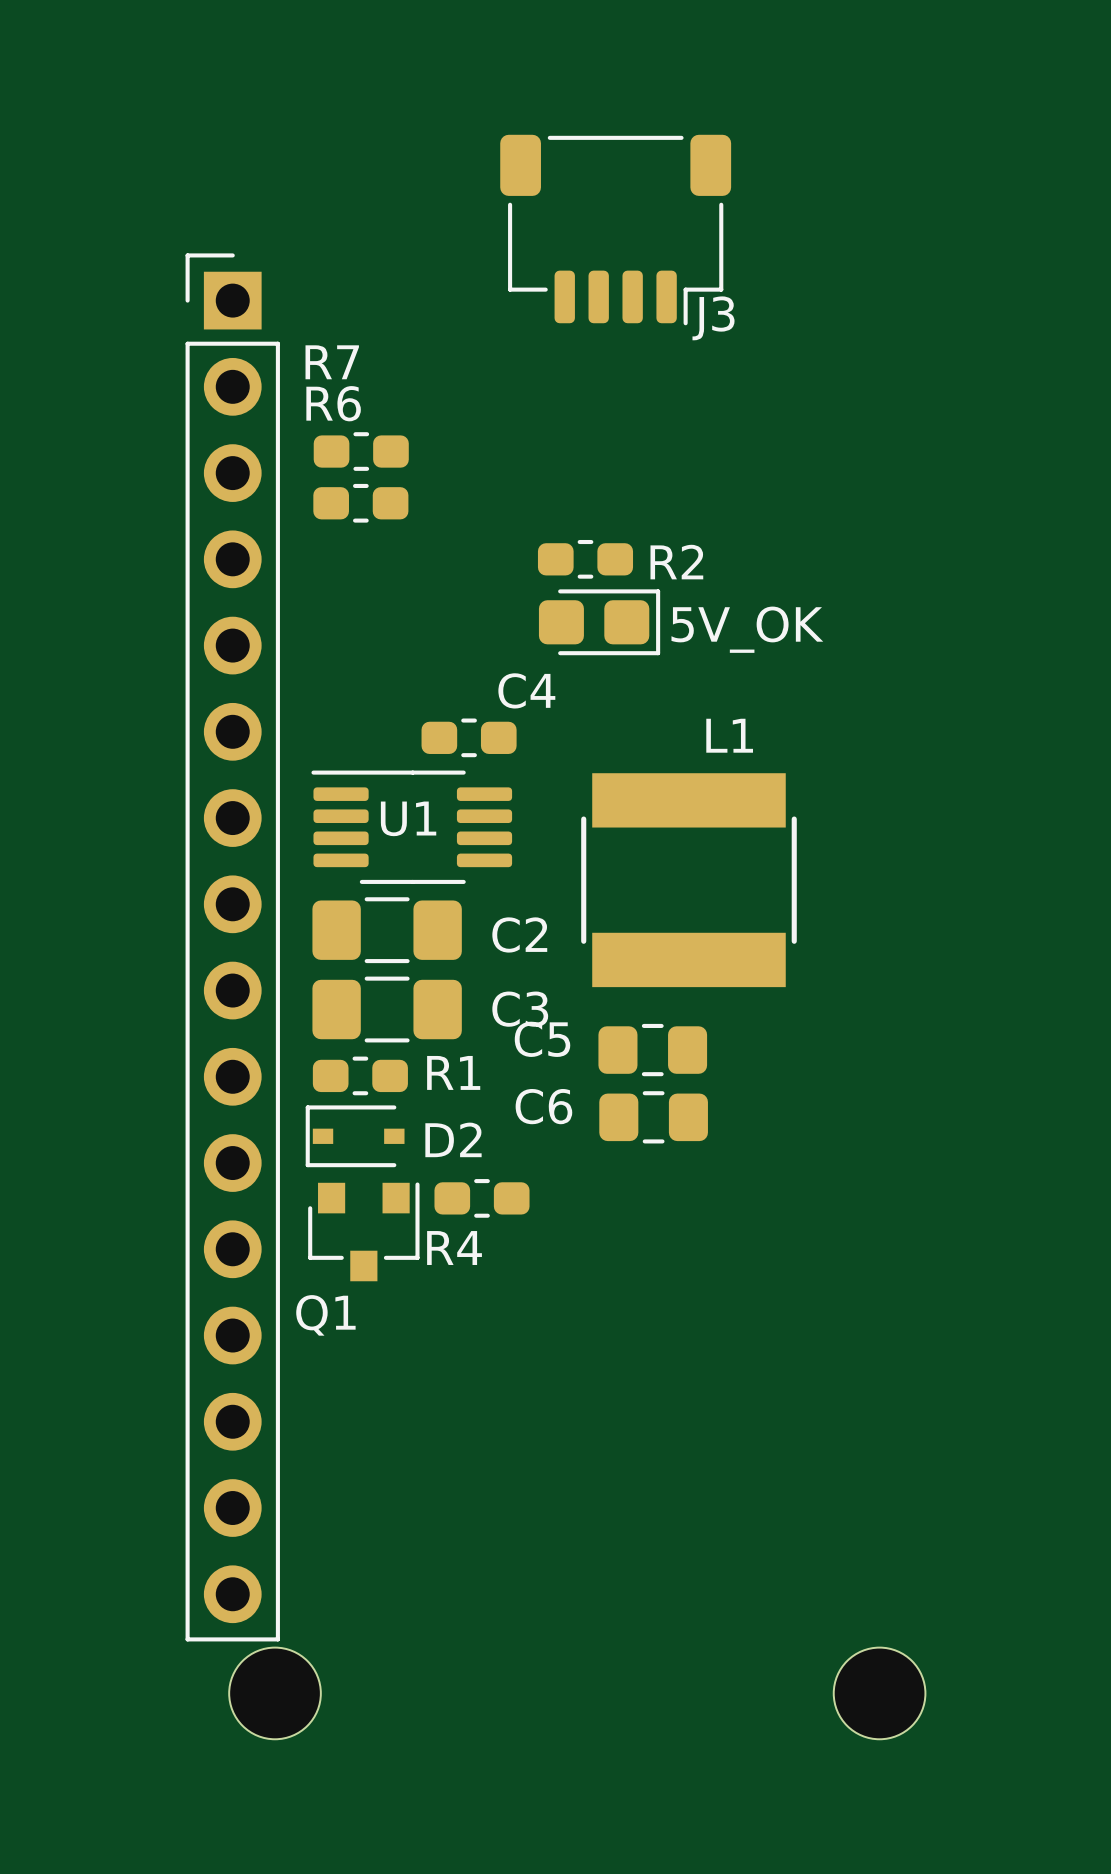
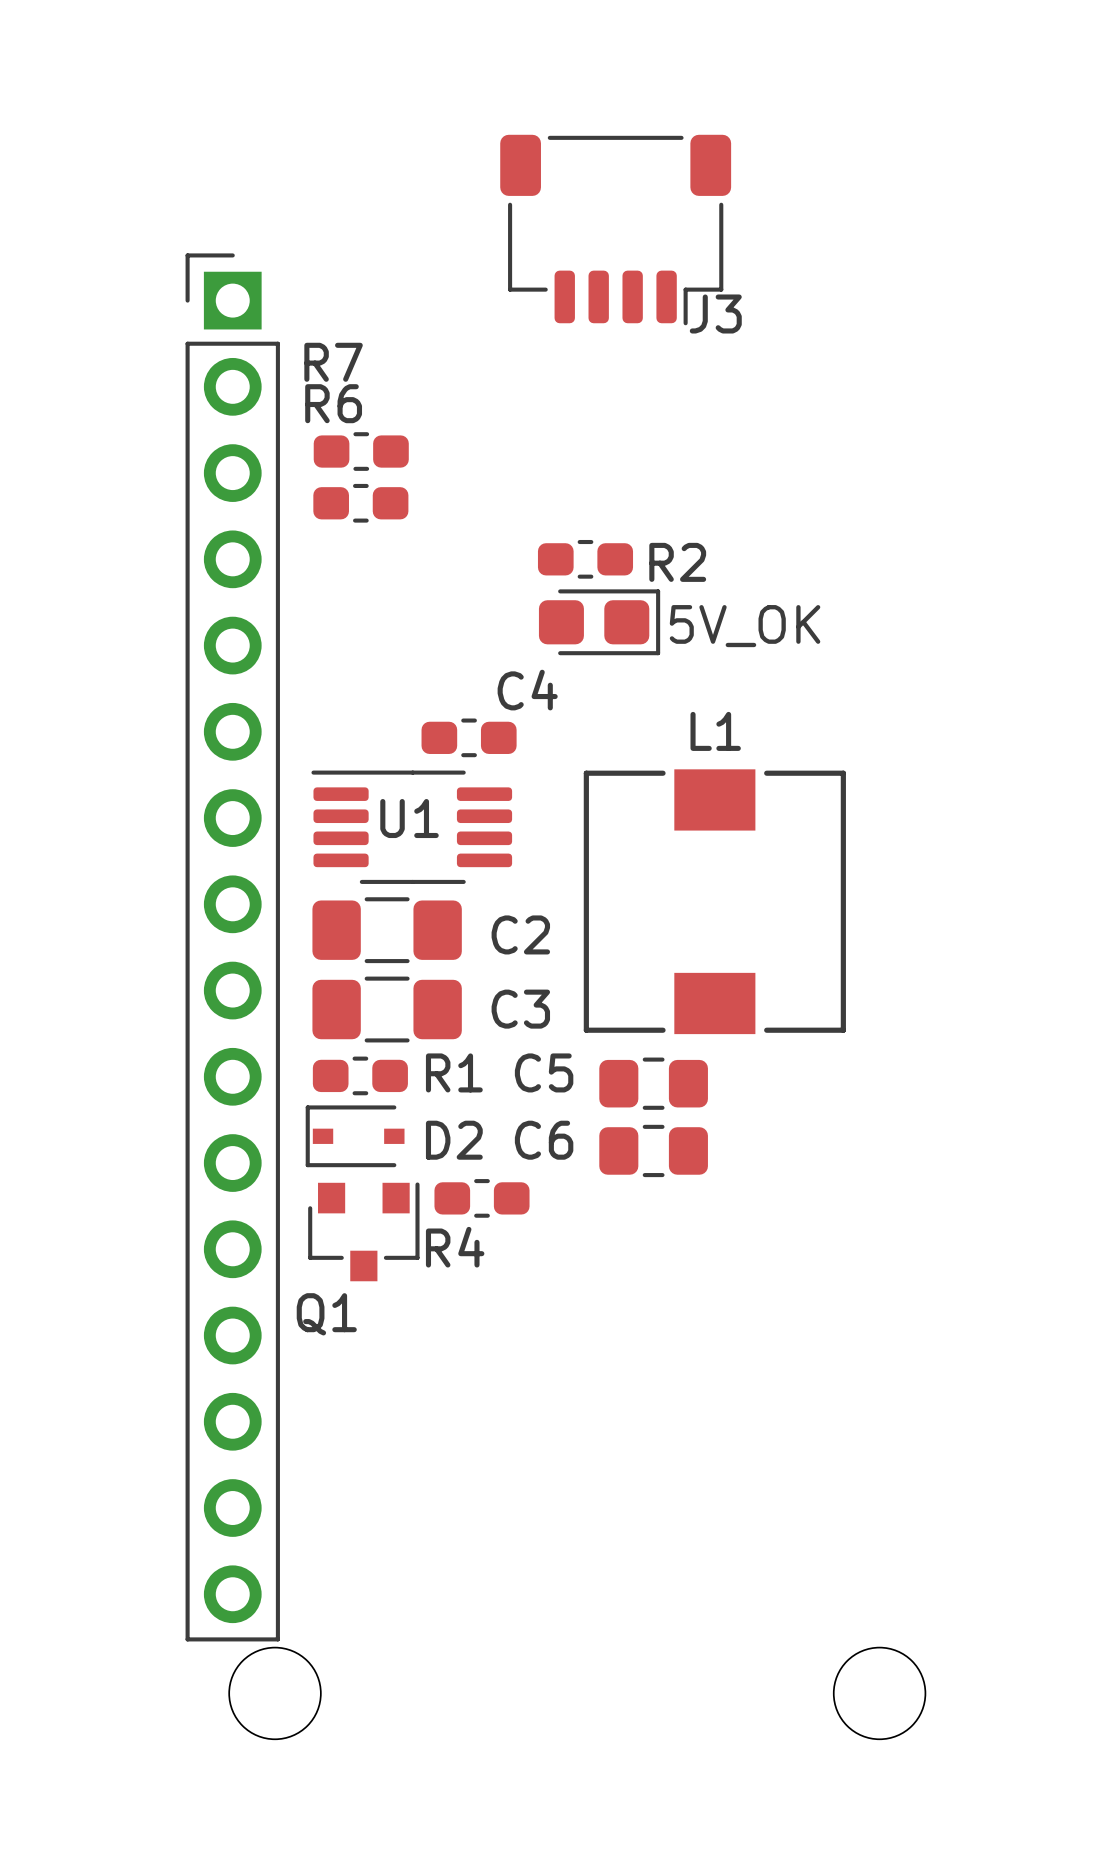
L1 footprint: [581, 773, 797, 988] -> [583, 769, 846, 1035]
C5 position: (652, 1050) -> (653, 1083)
C6 position: (653, 1117) -> (653, 1150)

